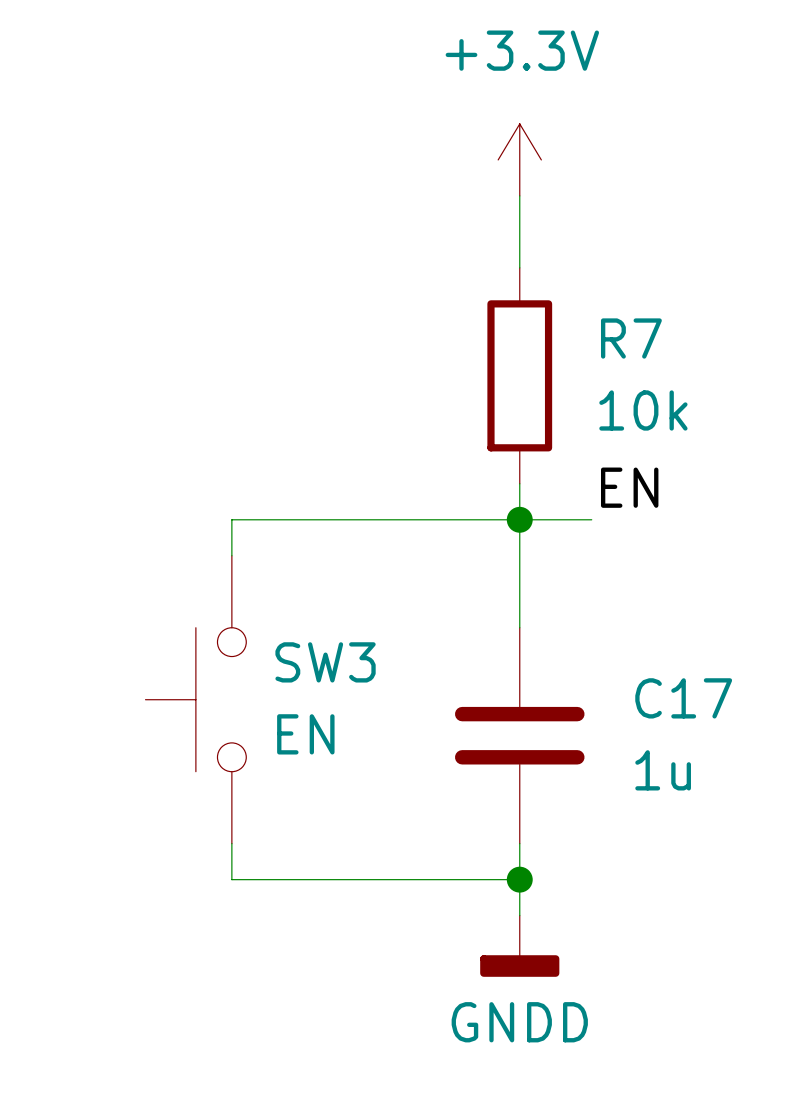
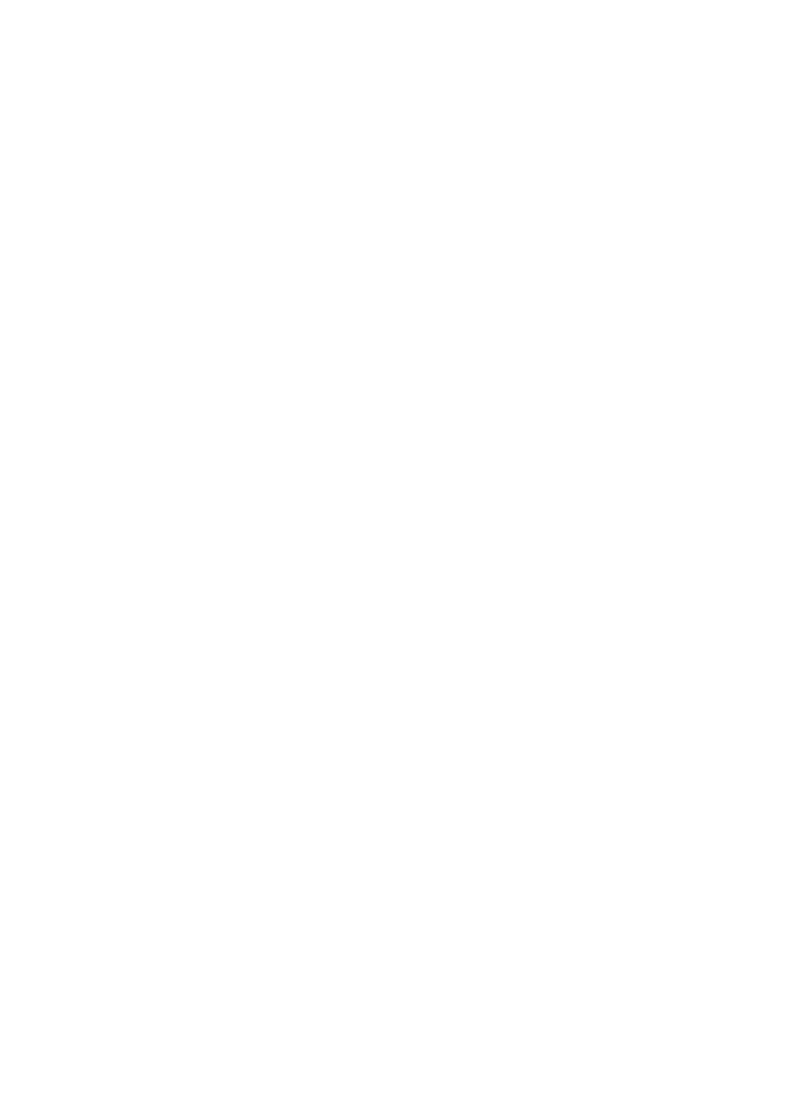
power symbol: +3.3V (519, 159) -> none
wire: (519, 195) (519, 267) -> none
R7: 10k (519, 375) -> none
wire: (519, 483) (519, 627) -> none
label: EN (629, 487) -> none
junction: (519, 519) -> none
wire: (591, 519) (231, 519) (231, 555) -> none
SW3: EN (195, 699) -> none
C17: 1u (519, 735) -> none
wire: (231, 843) (231, 879) (519, 879) -> none
wire: (519, 843) (519, 915) -> none
junction: (519, 879) -> none
power symbol: GNDD (519, 946) -> none

